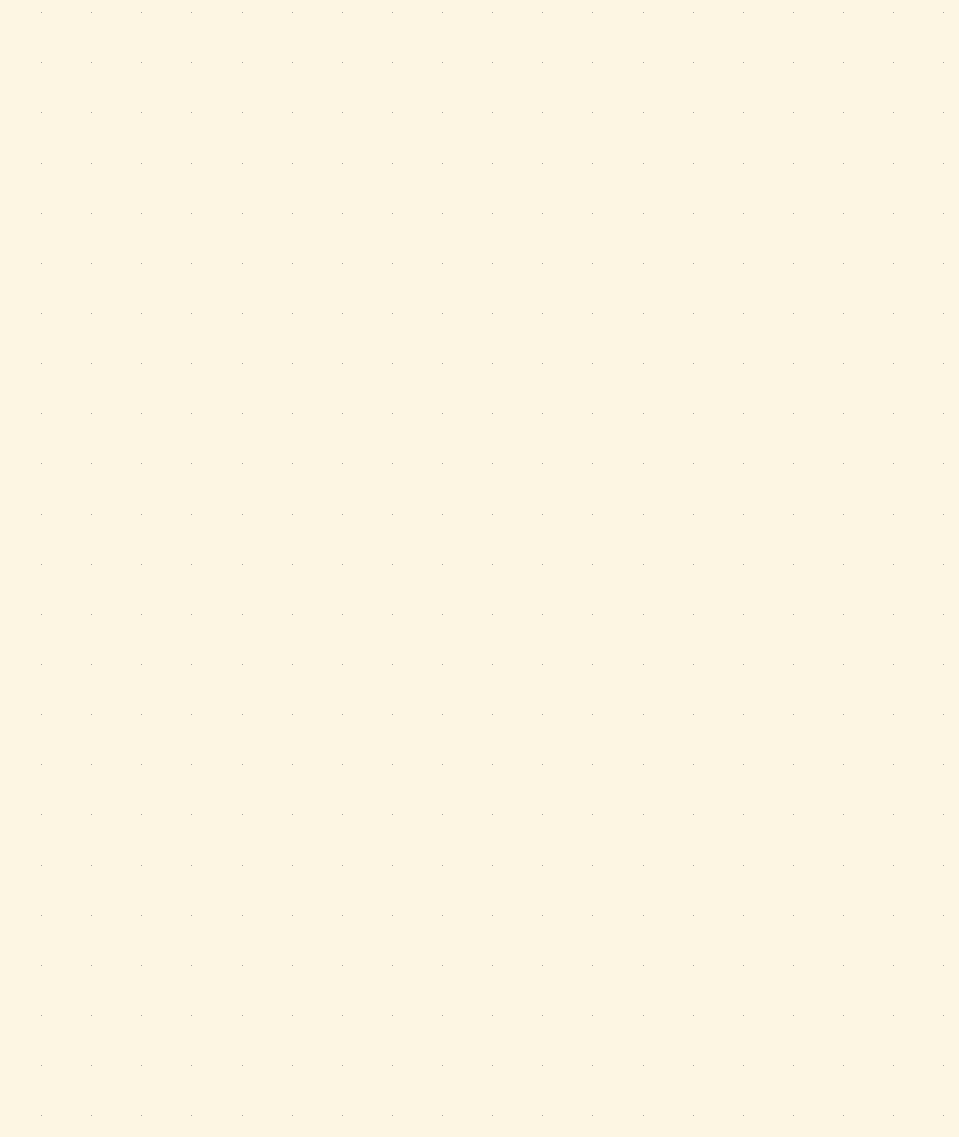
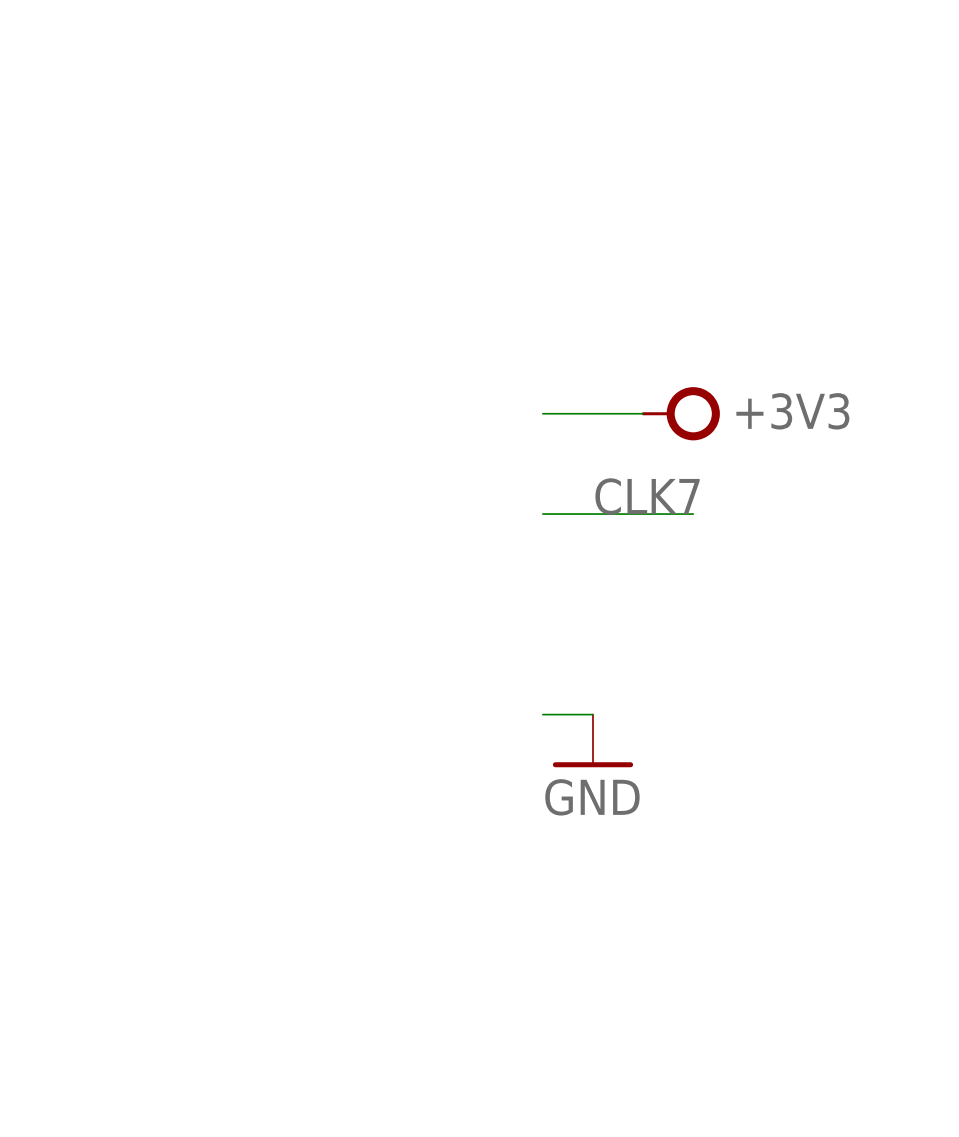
wire: none -> (542, 413) (643, 413)
power symbol: none -> +3V3 (680, 413)
label: none -> CLK7 (647, 496)
wire: none -> (542, 514) (693, 514)
wire: none -> (542, 714) (592, 714)
power symbol: none -> GND (592, 740)

